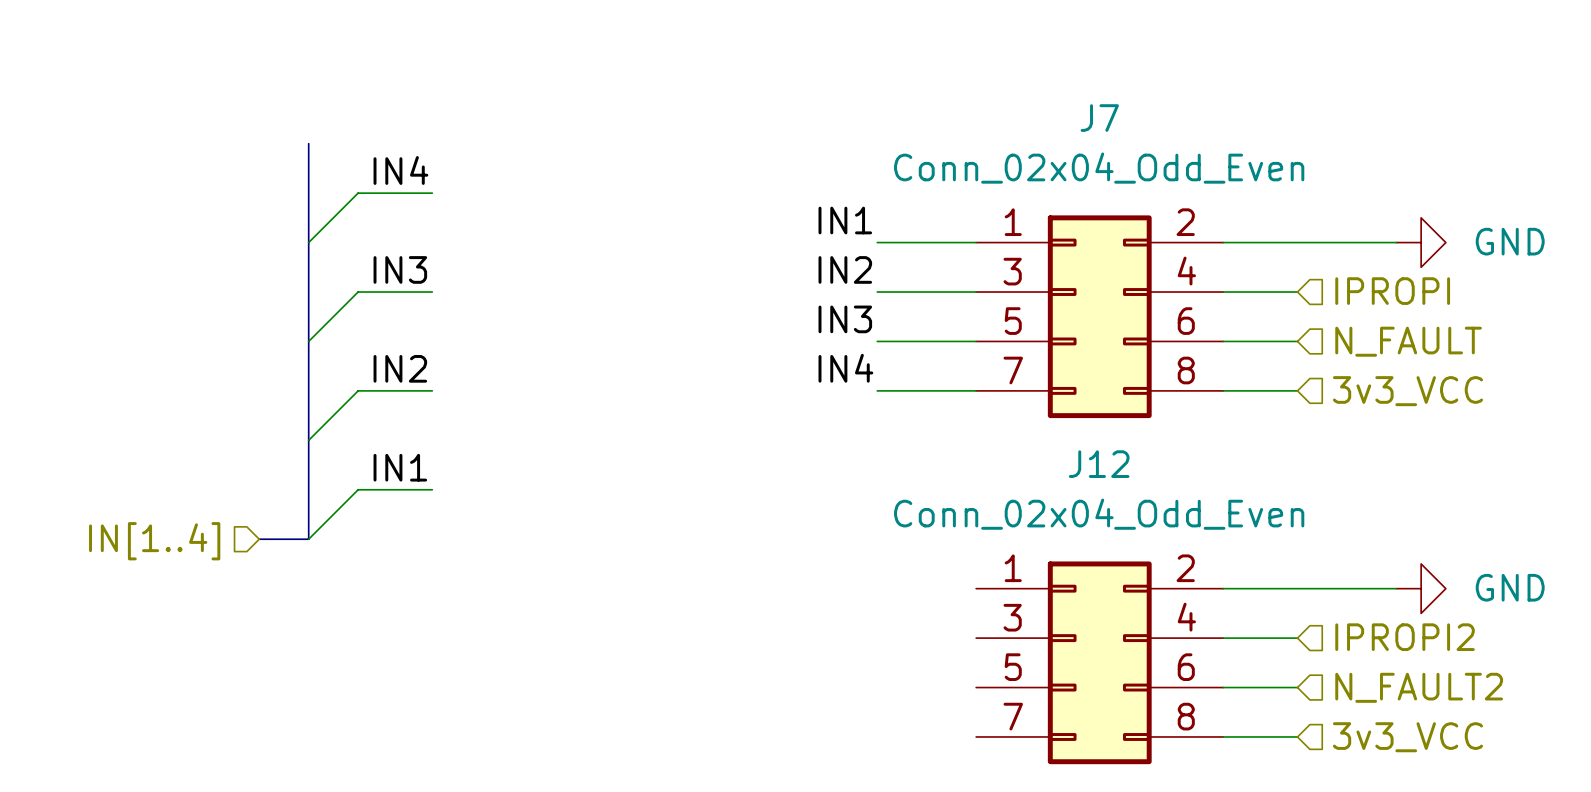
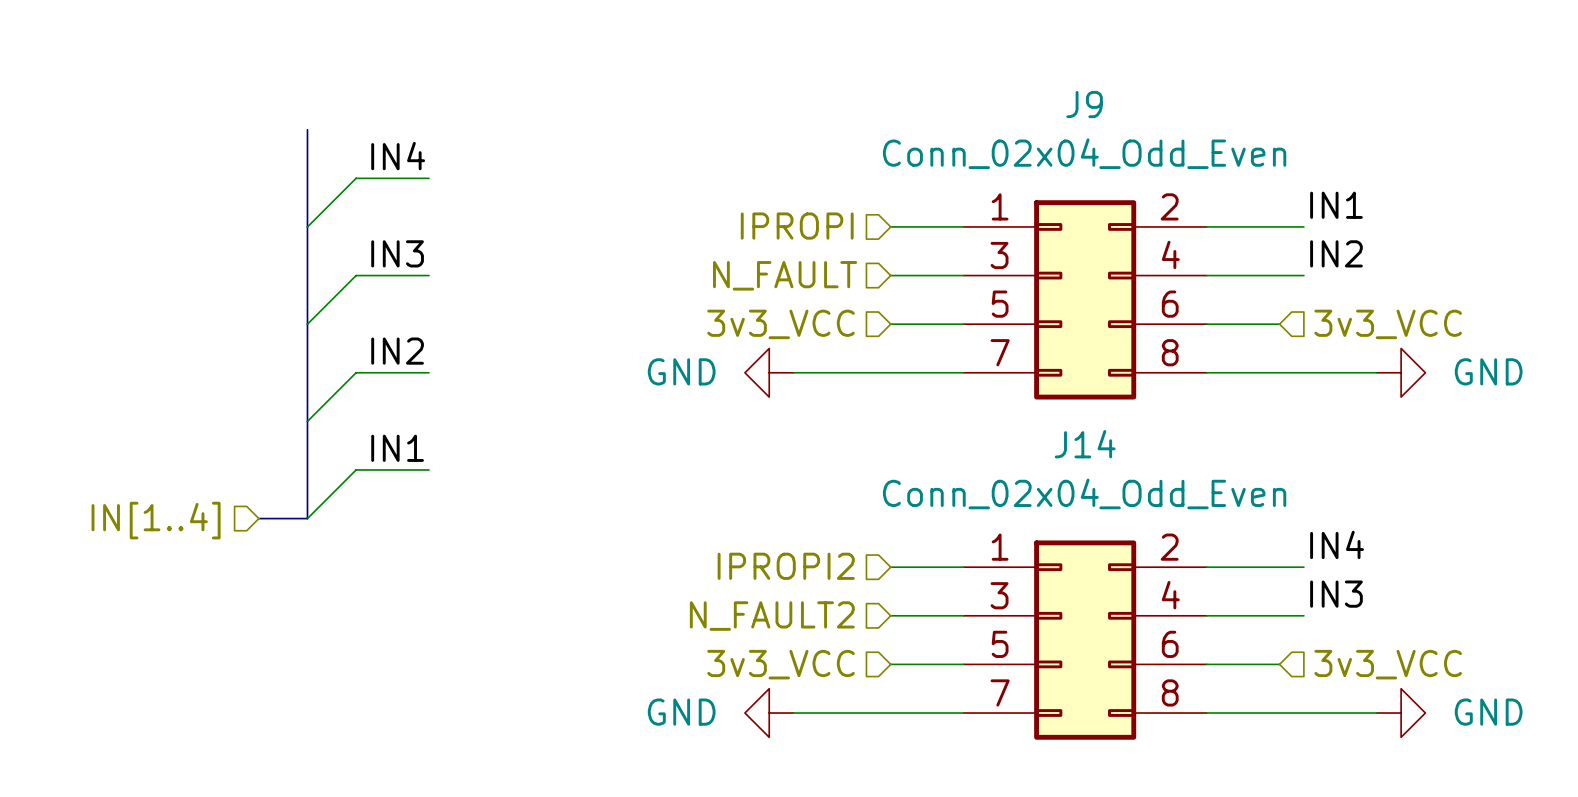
J7 name: J7 (1099, 118) -> J9 (1084, 104)
label position: IN1 (845, 220) -> IN1 (1336, 205)
wire: (877, 242) (901, 242) -> none
wire: (1322, 242) (1396, 242) -> none
power symbol: GND (1421, 242) -> none
label position: IN2 (845, 269) -> IN2 (1336, 253)
hierarchical label rotation: 0° (1392, 291) -> 180° (797, 226)
hierarchical label position: IPROPI (1392, 291) -> IPROPI (797, 226)
hierarchical label: none -> N_FAULT (785, 275)
wire: (877, 292) (901, 292) -> (1279, 275) (1303, 275)
label: IN3 (845, 319) -> none
hierarchical label: none -> 3v3_VCC (781, 324)
wire: (877, 341) (901, 341) -> none
hierarchical label: N_FAULT (1408, 341) -> 3v3_VCC (1388, 324)
label: IN4 (845, 368) -> none
power symbol: none -> GND (769, 372)
wire: none -> (793, 372) (866, 372)
wire: none -> (1279, 372) (1376, 372)
power symbol: none -> GND (1401, 372)
hierarchical label: 3v3_VCC (1407, 391) -> none
J12 name: J12 (1099, 464) -> J14 (1085, 444)
label: none -> IN4 (1337, 544)
wire: (1322, 588) (1396, 588) -> (890, 567) (963, 567)
power symbol: GND (1421, 588) -> none
label: none -> IN3 (1336, 594)
hierarchical label rotation: 0° (1405, 637) -> 180° (786, 566)
hierarchical label position: IPROPI2 (1405, 637) -> IPROPI2 (786, 566)
hierarchical label: none -> N_FAULT2 (772, 616)
wire: none -> (890, 615) (963, 615)
wire: none -> (1279, 615) (1303, 615)
hierarchical label: none -> 3v3_VCC (781, 664)
wire: none -> (890, 664) (963, 664)
hierarchical label: N_FAULT2 (1419, 687) -> 3v3_VCC (1388, 664)
power symbol: none -> GND (769, 713)
wire: none -> (793, 713) (963, 713)
wire: none -> (1279, 713) (1376, 713)
power symbol: none -> GND (1401, 713)
hierarchical label: 3v3_VCC (1407, 737) -> none

